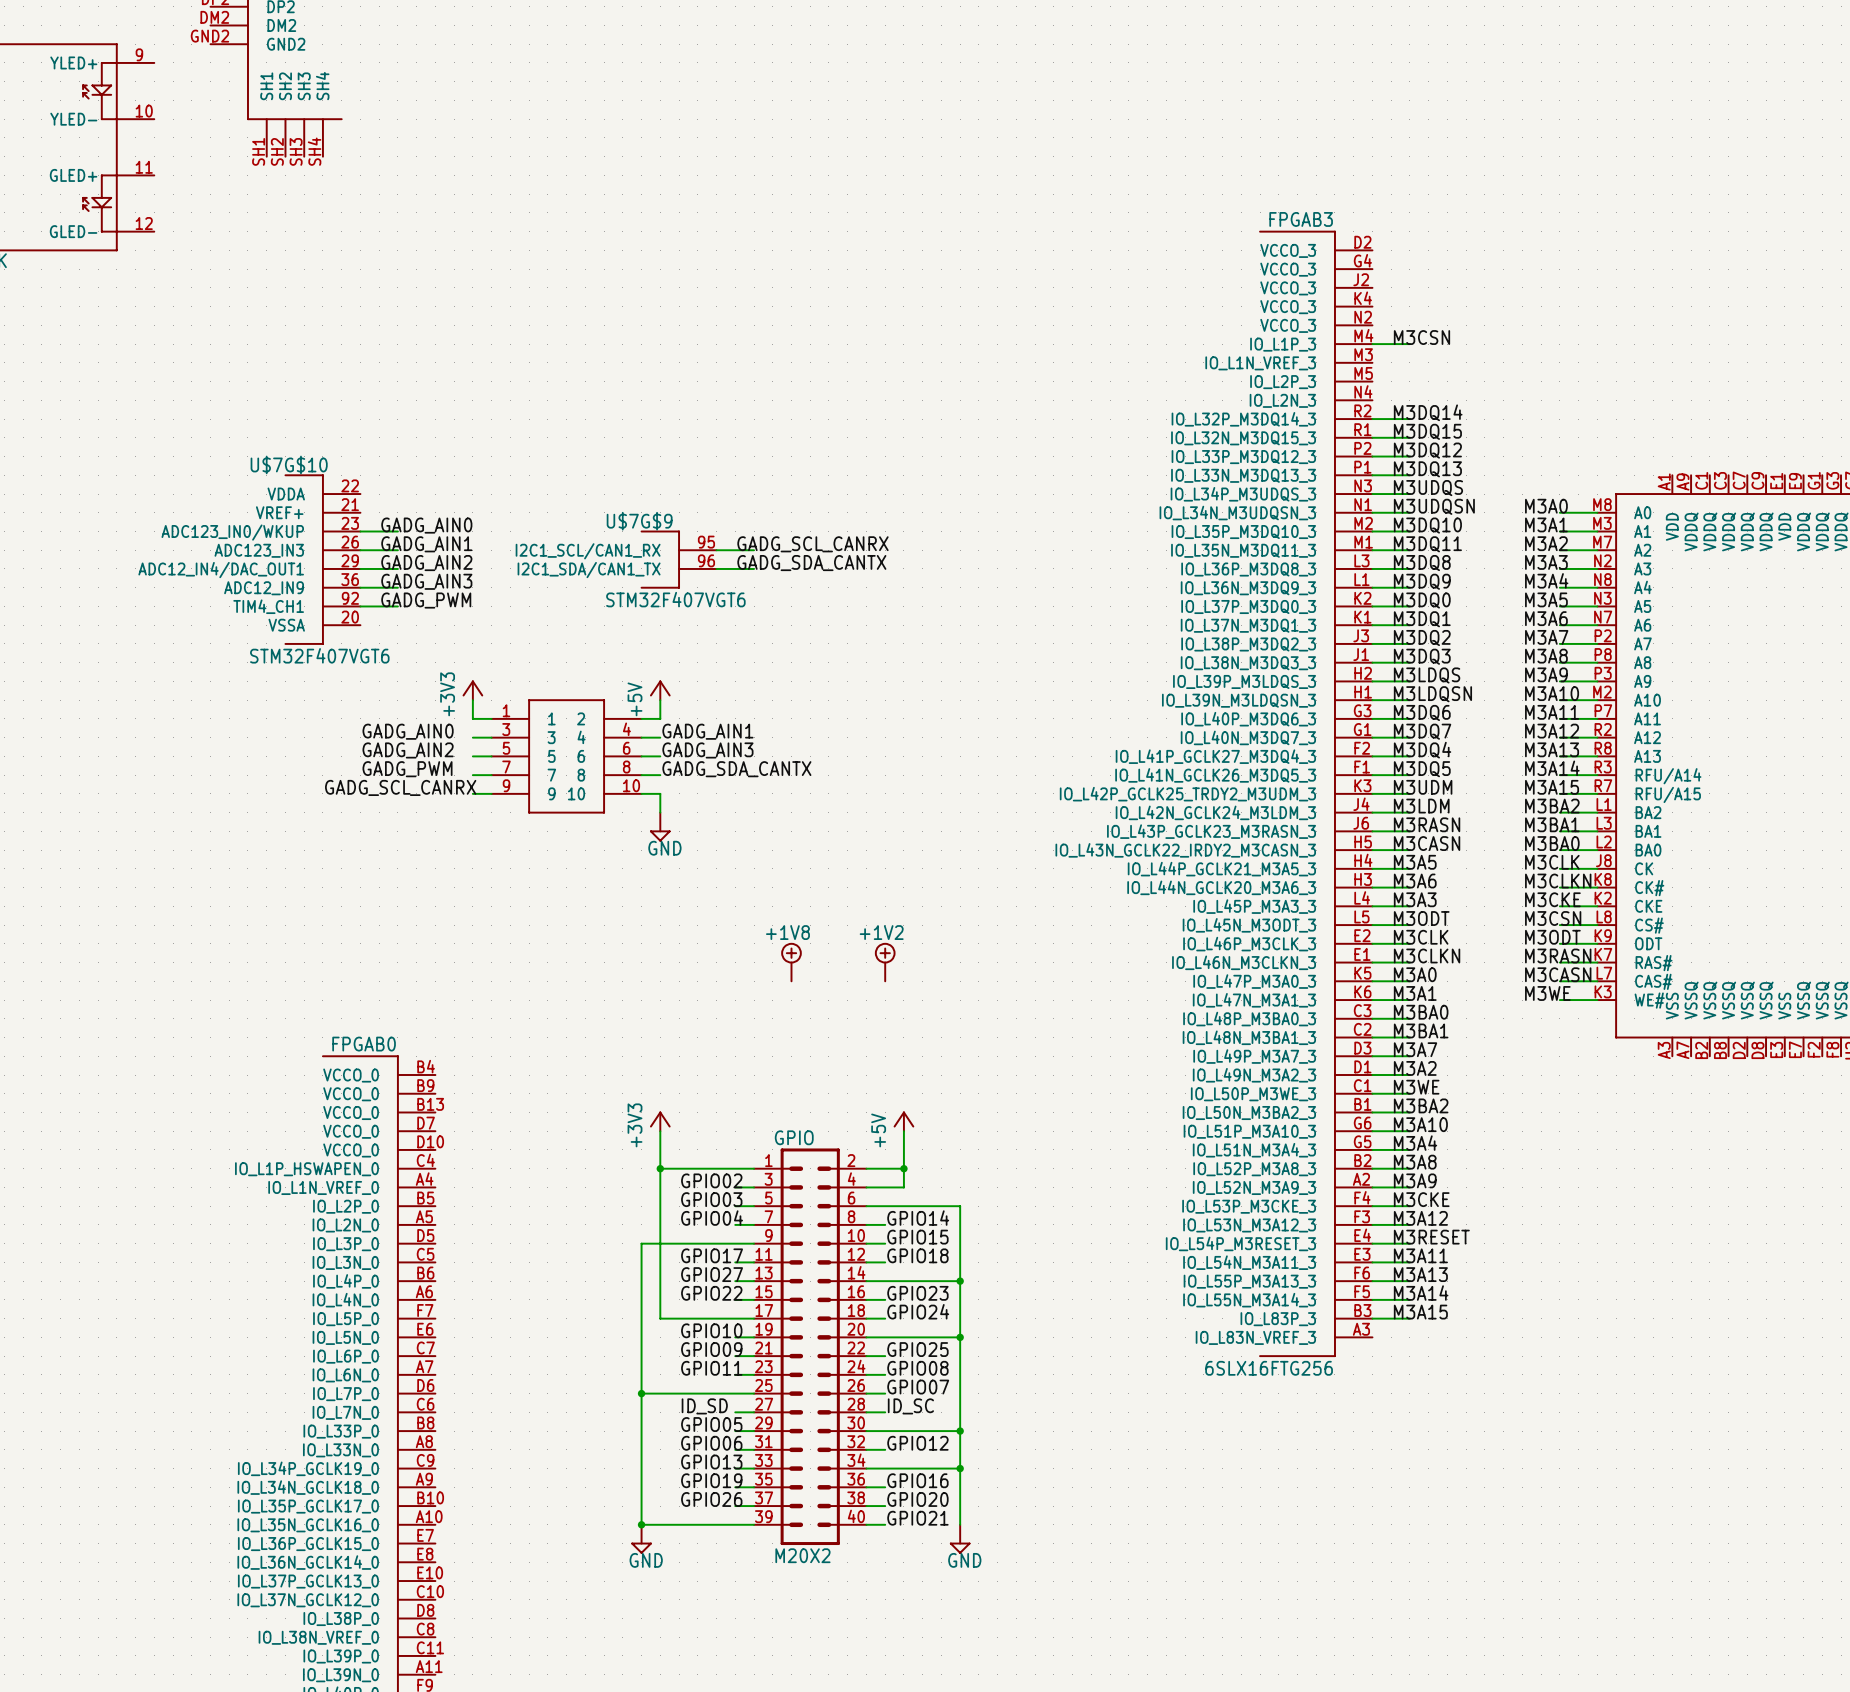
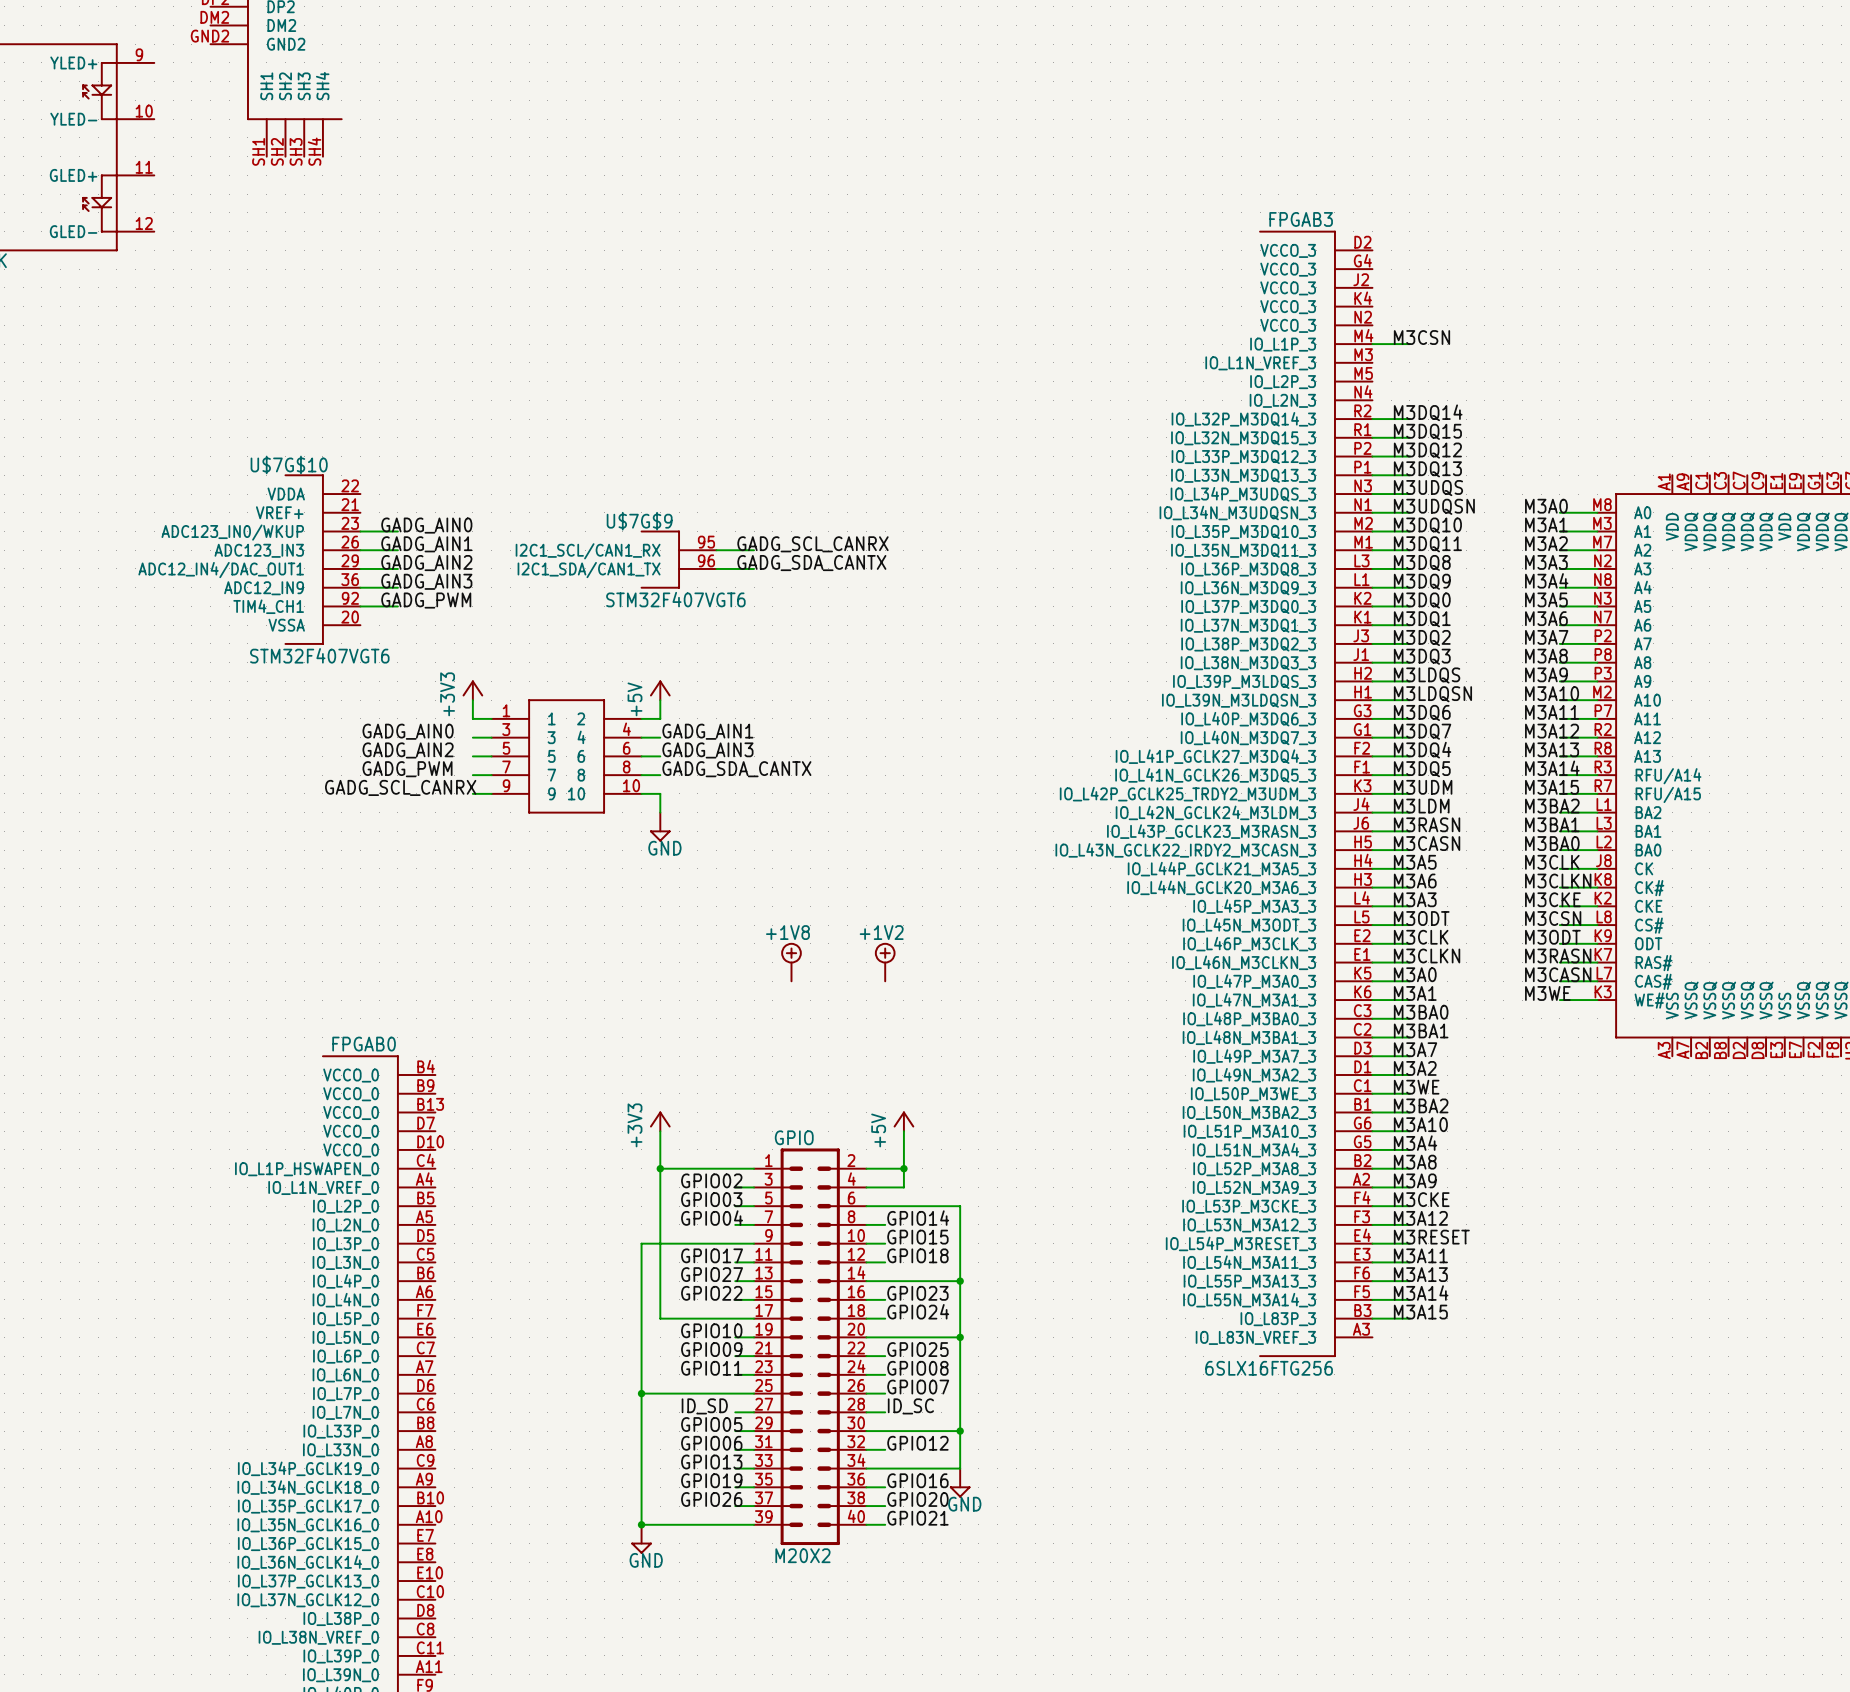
wire: (960, 1468) (960, 1524) -> none
junction: (960, 1468) -> none
power symbol position: GND (960, 1539) -> GND (960, 1483)

